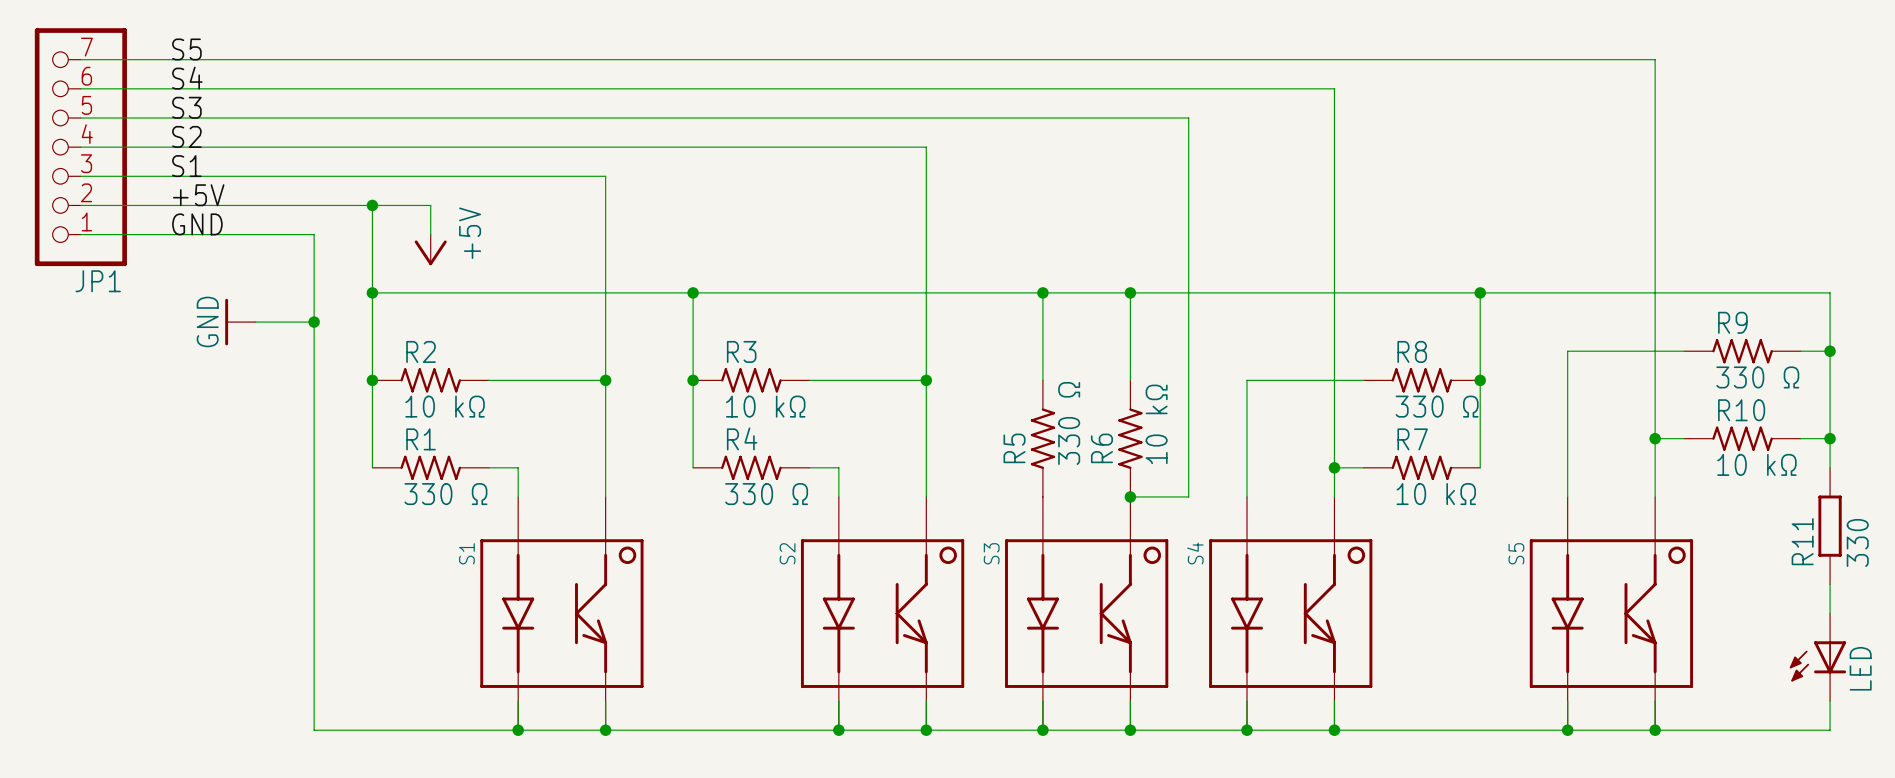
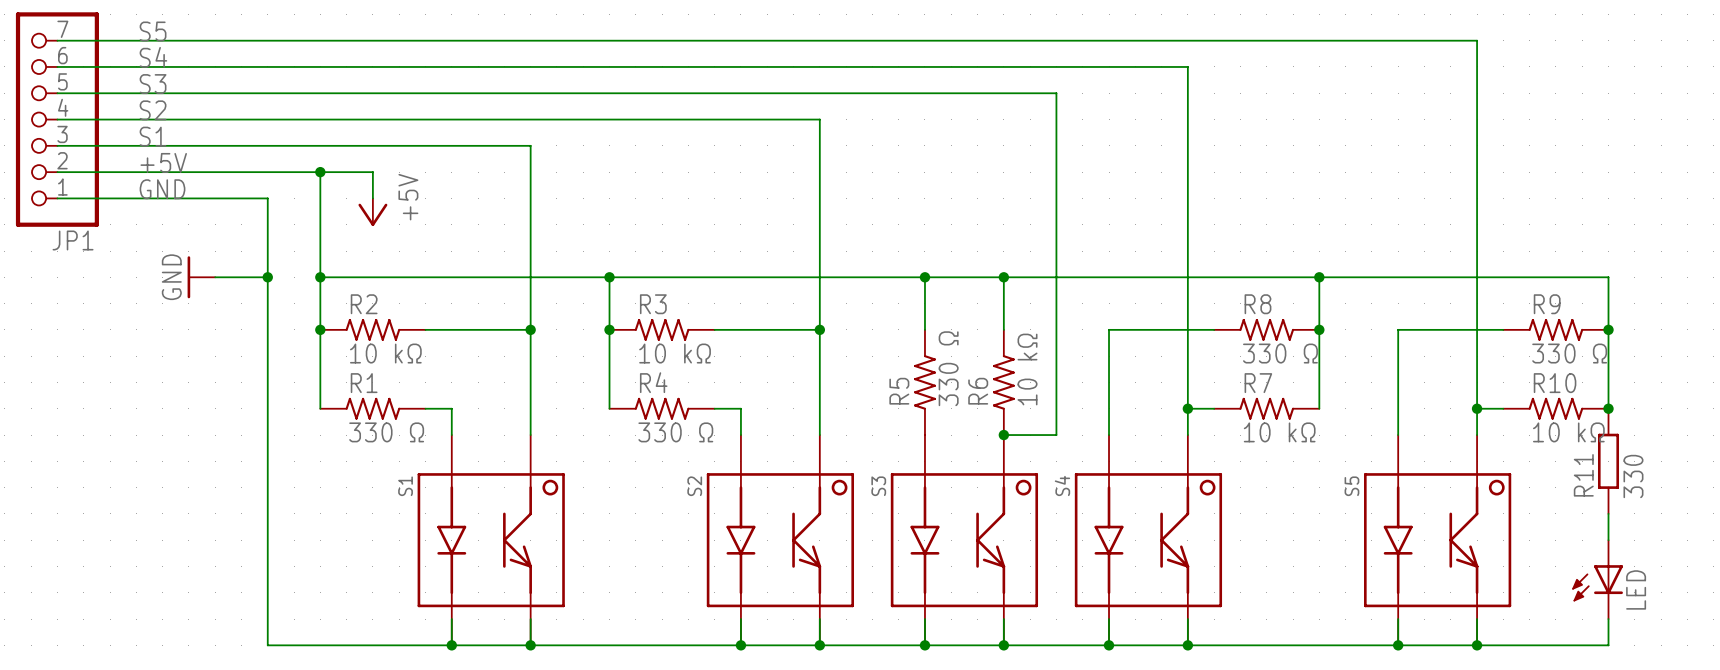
wire: (372, 292) (1830, 292) (1830, 467) -> none
junction position: (372, 292) -> (320, 277)
wire: (693, 292) (693, 322) -> none
junction position: (693, 292) -> (609, 277)
wire: (1042, 292) (1042, 322) -> none
junction position: (1042, 292) -> (924, 277)
wire: (1130, 292) (1130, 322) -> none
junction position: (1130, 292) -> (1003, 277)
wire: (1480, 292) (1480, 322) -> none
junction position: (1480, 292) -> (1319, 277)
wire: none -> (320, 277) (1608, 277) (1608, 408)
wire: (1684, 351) (1567, 351) (1567, 380) -> (1503, 329) (1398, 329)
R9 position: (1742, 351) -> (1555, 329)
wire: (1800, 351) (1830, 351) -> none
junction: (1830, 351) -> none
junction: none -> (1608, 329)
wire: (1655, 438) (1684, 438) -> (1477, 408) (1503, 408)
junction position: (1655, 438) -> (1477, 408)
R10 position: (1742, 438) -> (1555, 408)
wire: (1800, 438) (1830, 438) -> none
junction: (1830, 438) -> none
junction: none -> (1608, 408)
R11 position: (1830, 526) -> (1608, 461)
wire: (1830, 584) (1830, 613) -> (1608, 513) (1608, 540)
LED position: (1817, 657) -> (1597, 579)
wire: (1830, 701) (1830, 730) (1800, 730) -> (1608, 619) (1608, 645)

